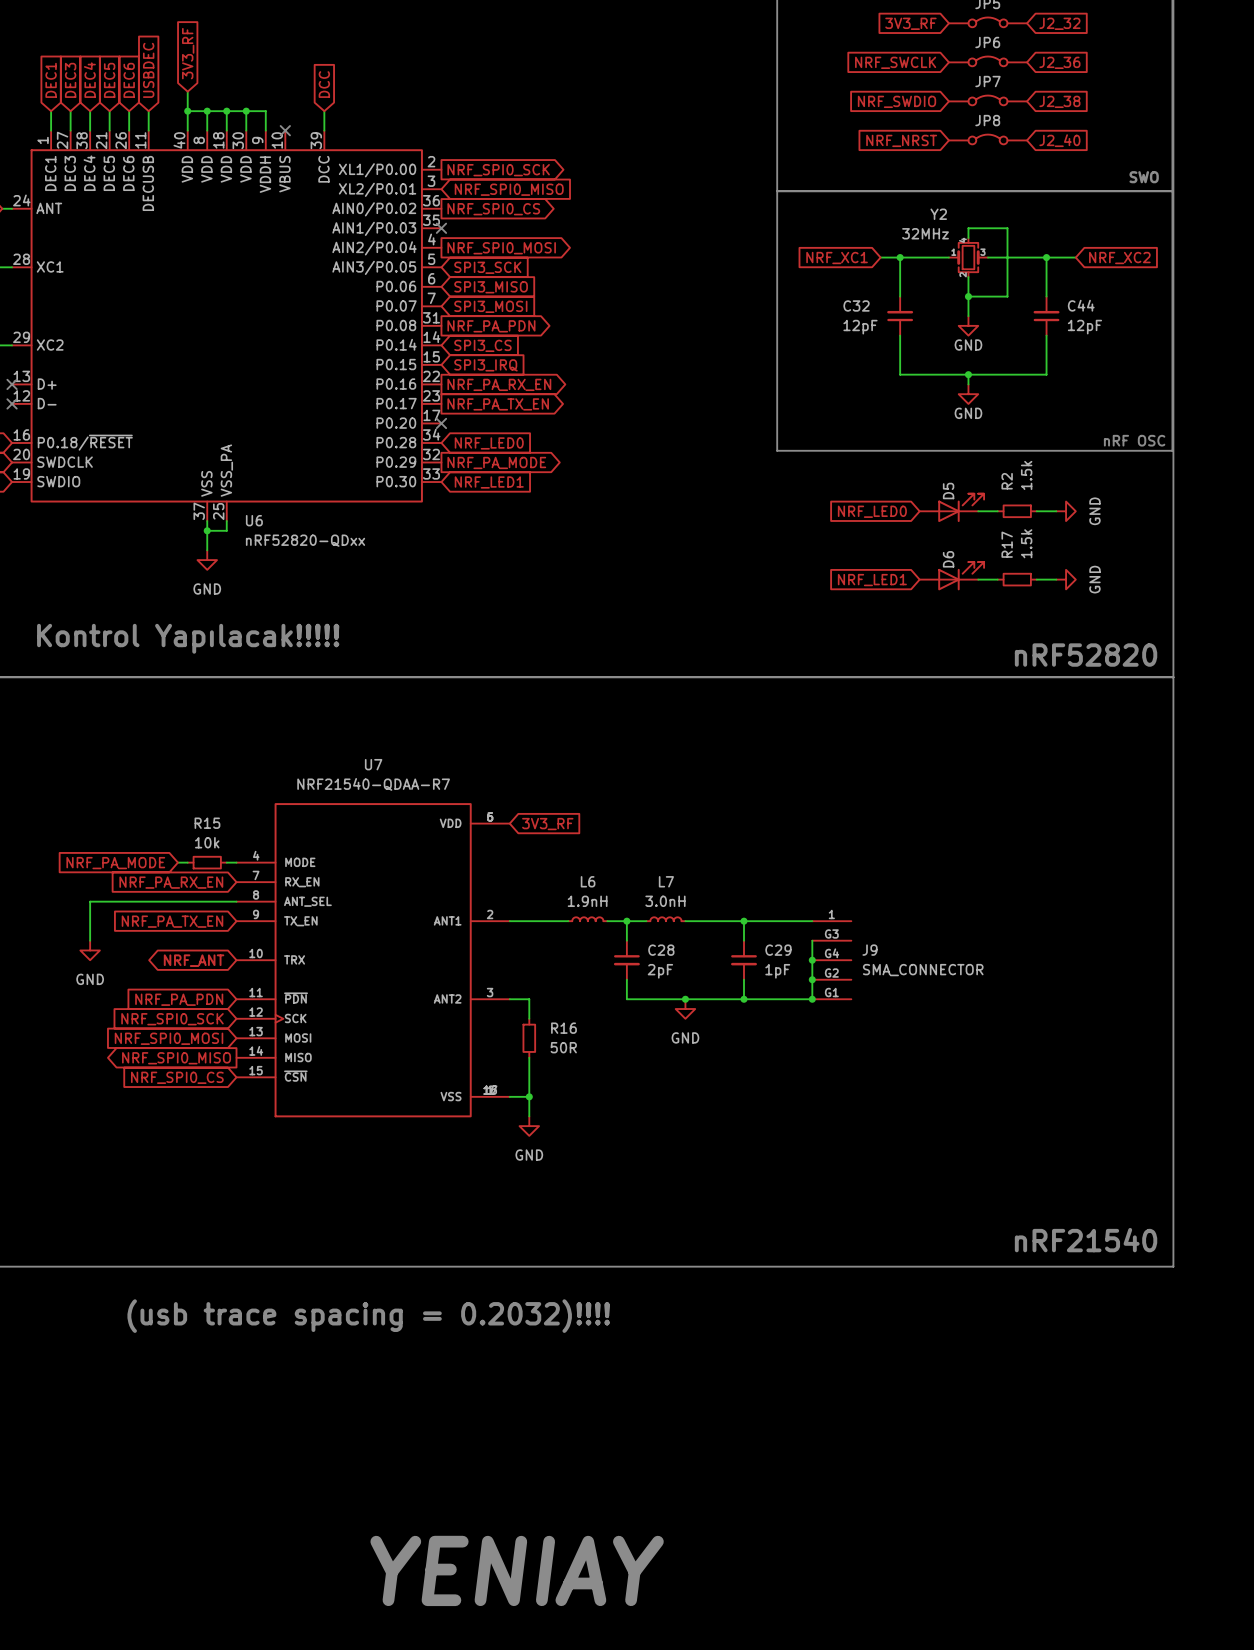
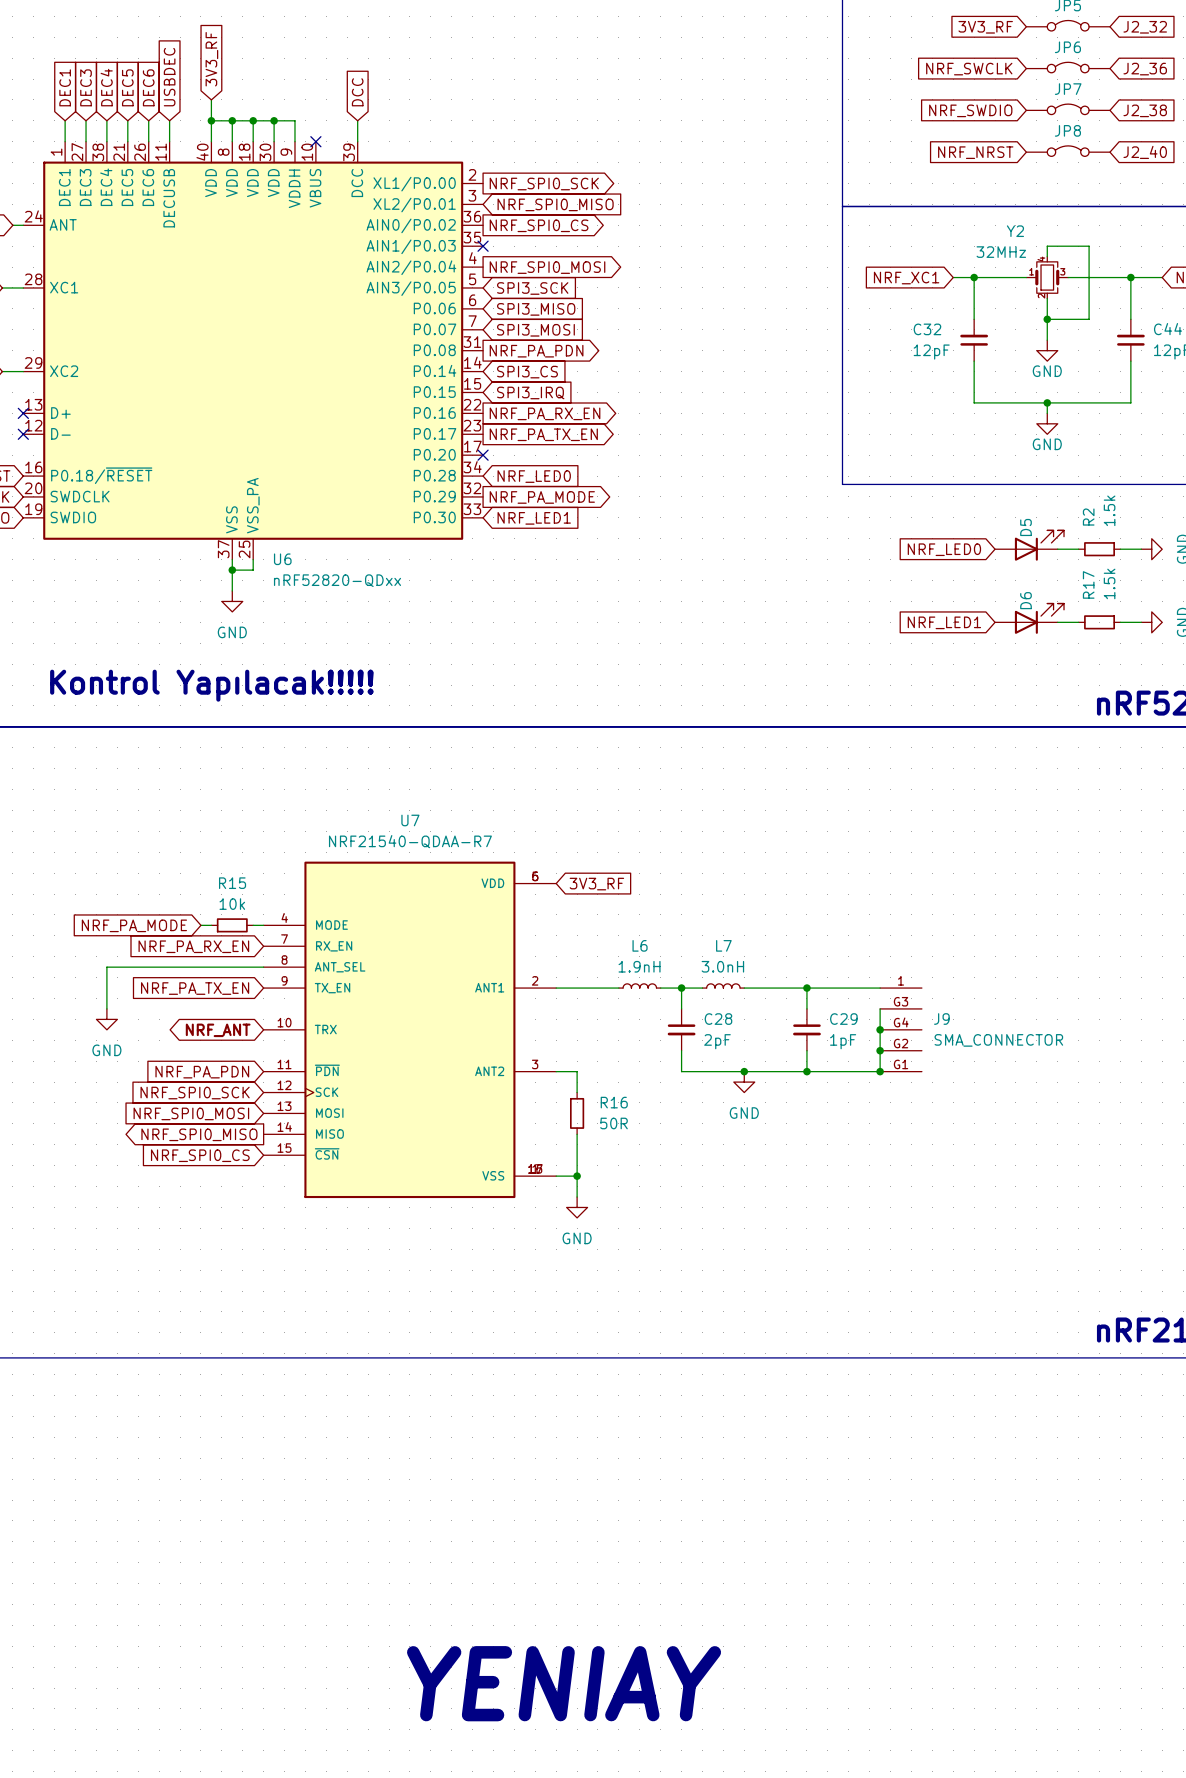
text: (usb trace spacing = 0.2032)!!!! (368, 1316) -> none

